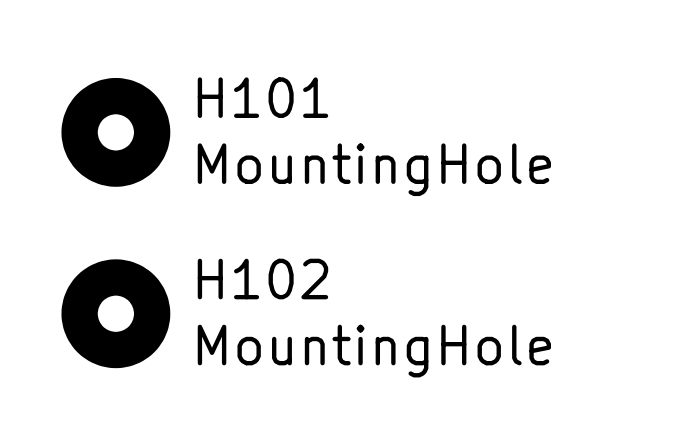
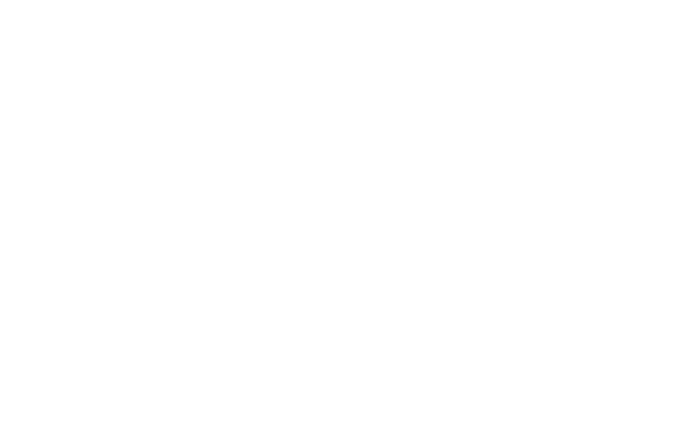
H101: MountingHole (115, 132) -> none
H102: MountingHole (115, 313) -> none

